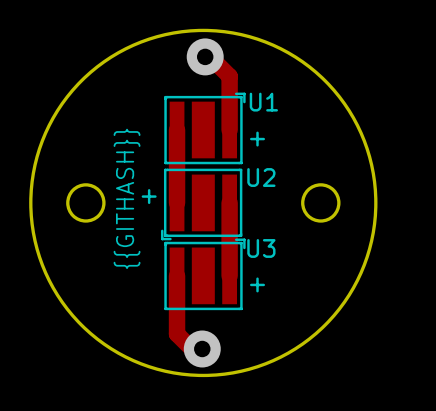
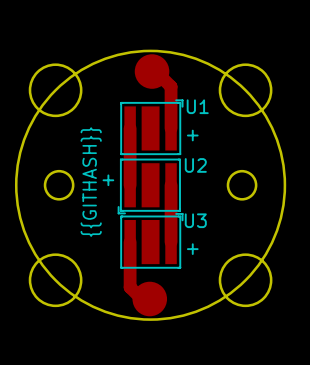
drawing: none -> [134, 54, 170, 89]
round board edge: none -> [28, 63, 83, 118]
round board edge: none -> [218, 63, 273, 118]
via: (205, 56) -> none
round board edge: none -> [28, 253, 83, 308]
round board edge: none -> [218, 253, 273, 308]
drawing: none -> [132, 281, 168, 317]
via: (202, 348) -> none

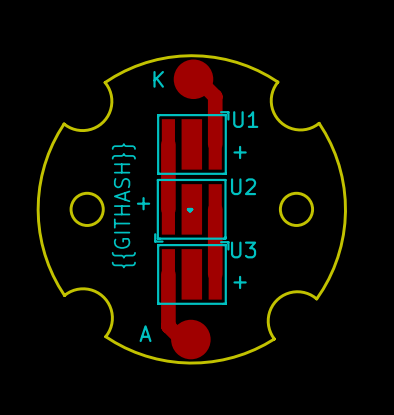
round board edge: [14, 49, 287, 321] -> none
round board edge: [28, 63, 83, 118] -> none
round board edge: [218, 63, 273, 118] -> none
text: none -> K (158, 79)
board edge: none -> (277, 82) (247, 66) (225, 59) (191, 55) (157, 59) (135, 66) (105, 82) (111, 95) (111, 106) (107, 116) (97, 126) (80, 130) (64, 123) (48, 154) (41, 175) (38, 209) (41, 243) (48, 265) (64, 295) (73, 290) (88, 289) (98, 292) (108, 303) (112, 320) (105, 336) (125, 347) (156, 358) (189, 363) (222, 359) (244, 353) (274, 339) (269, 329) (268, 318) (272, 305) (280, 297) (289, 292) (300, 291) (316, 298) (333, 268) (341, 246) (345, 211) (341, 176) (330, 143) (319, 123) (309, 128) (295, 129) (282, 123) (275, 115) (271, 98) (277, 82)
line: none -> (188, 209) (191, 209) (190, 211) (188, 209)
round board edge: [28, 253, 83, 308] -> none
round board edge: [218, 253, 273, 308] -> none
text: none -> A (145, 333)

